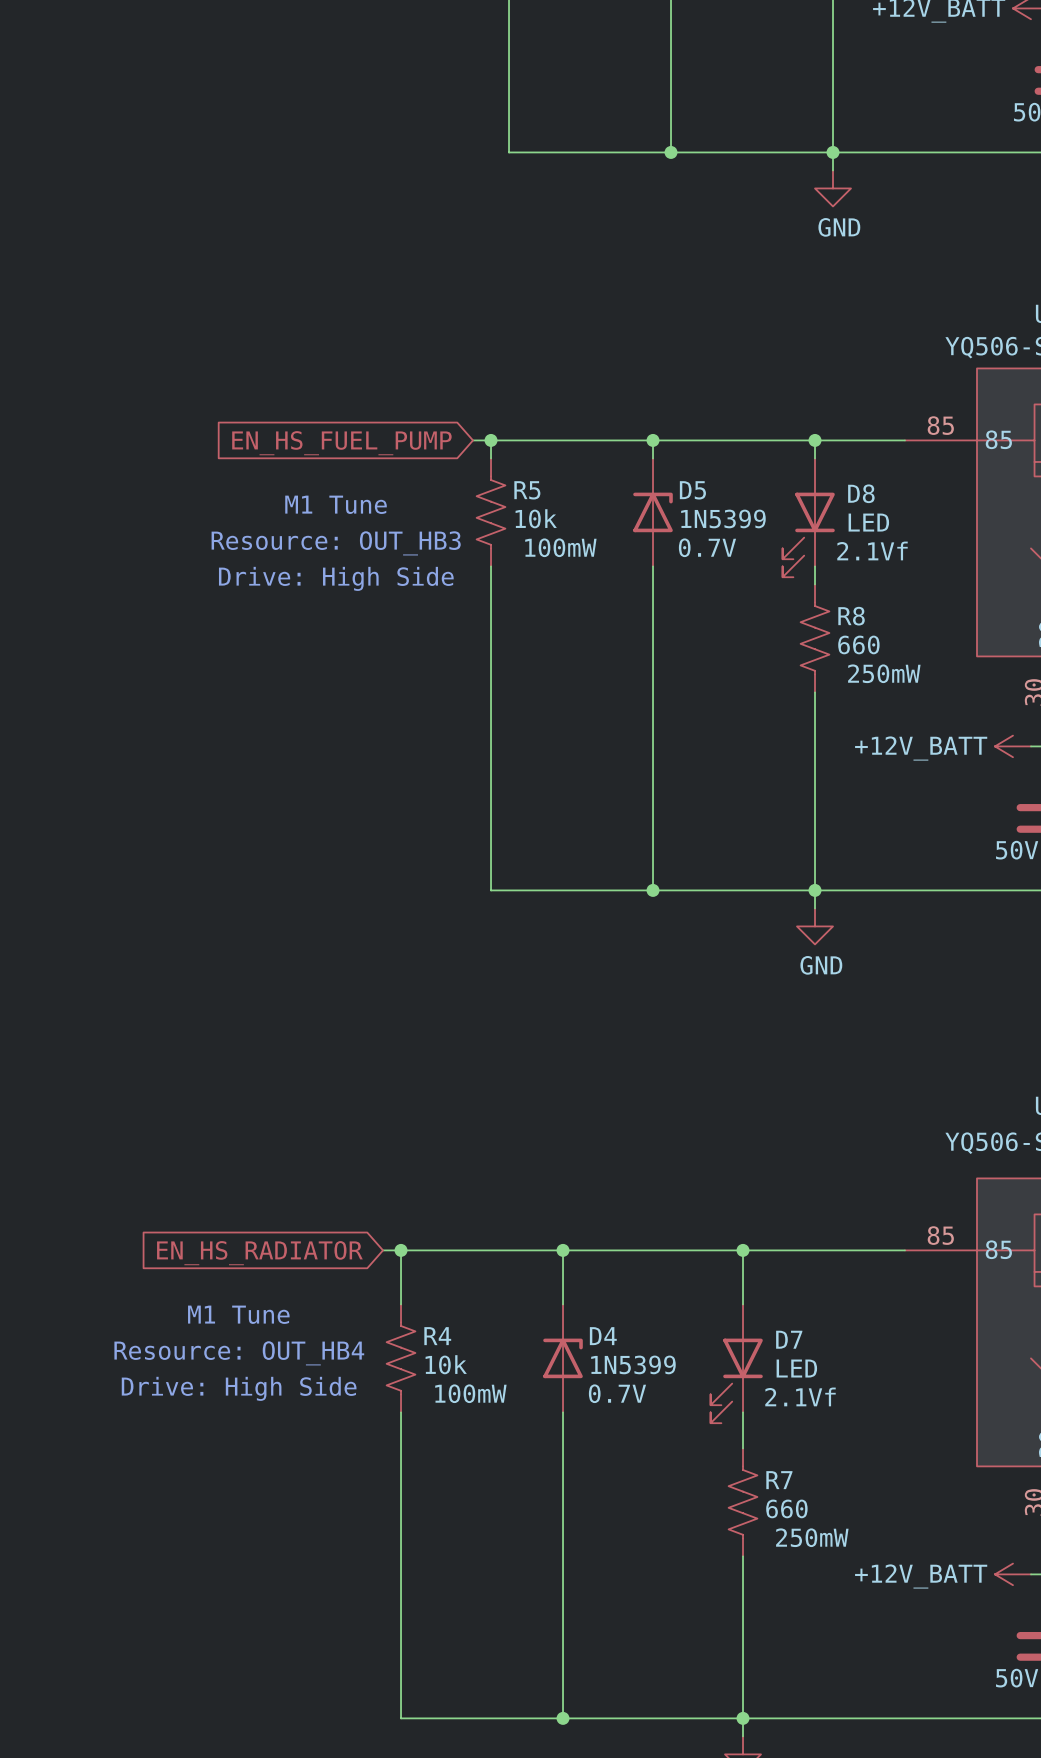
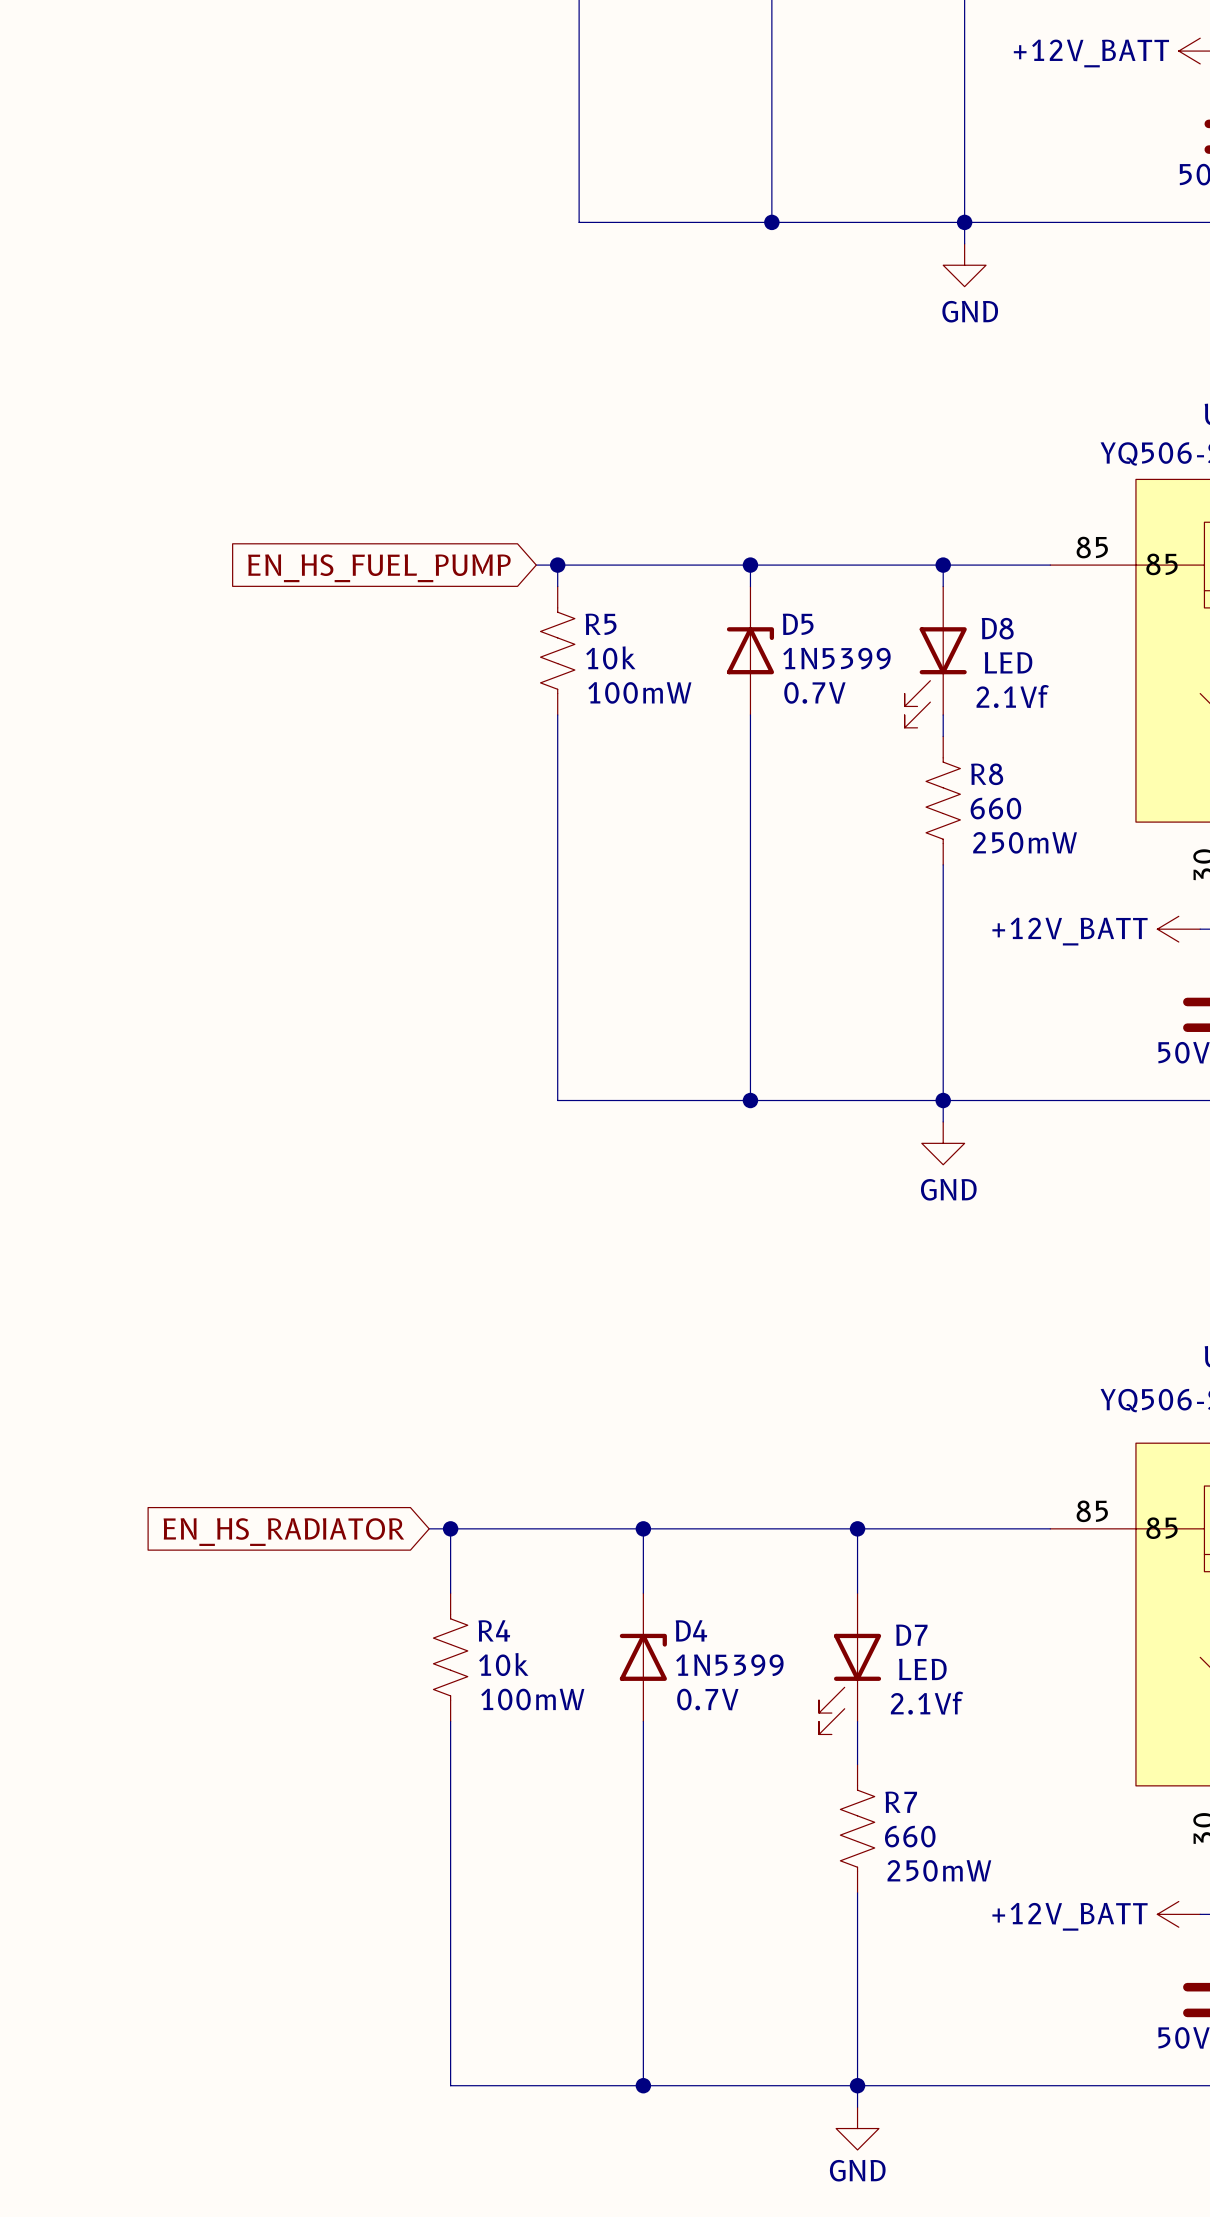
text: M1 Tune (336, 504) -> none
text: Resource: OUT_HB3 (336, 543) -> none
text: Drive: High Side (336, 578) -> none
text: M1 Tune (238, 1314) -> none
text: Resource: OUT_HB4 (239, 1353) -> none
text: Drive: High Side (239, 1388) -> none

